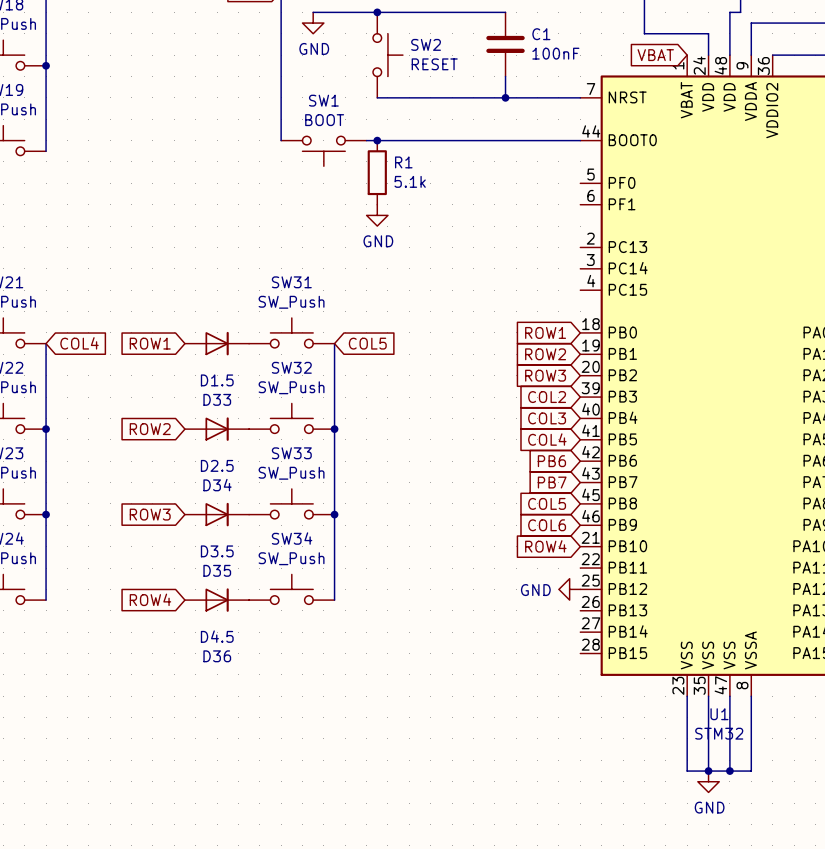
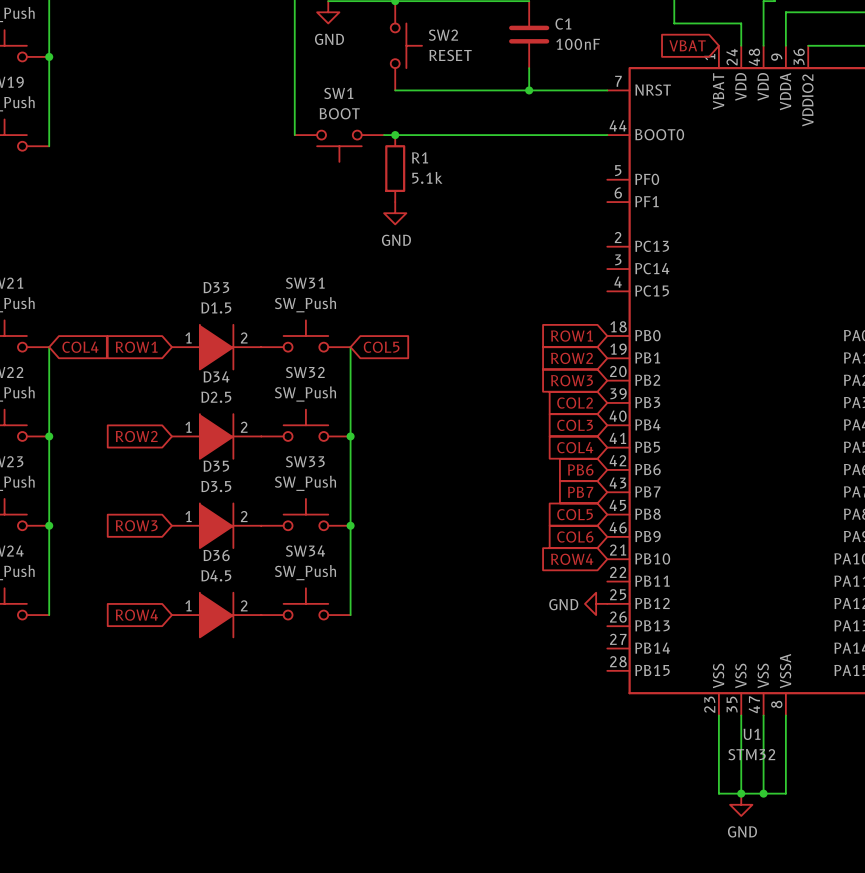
D33 symbol: [184, 331, 250, 356] -> [171, 324, 262, 370]
global label position: ROW1 (150, 343) -> ROW1 (136, 347)
D33 value position: D1.5 (217, 380) -> D1.5 (216, 307)
D33 name position: D33 (217, 399) -> D33 (216, 287)
D34 symbol: [184, 417, 250, 441] -> [171, 414, 262, 459]
global label position: ROW2 (150, 429) -> ROW2 (136, 436)
D34 value position: D2.5 (217, 465) -> D2.5 (216, 397)
D34 name position: D34 (217, 485) -> D34 (216, 376)
D35 symbol: [184, 502, 250, 527] -> [171, 503, 262, 549]
global label position: ROW3 (150, 514) -> ROW3 (136, 525)
D35 value position: D3.5 (217, 551) -> D3.5 (216, 486)
D35 name position: D35 (217, 570) -> D35 (216, 466)
D36 symbol: [184, 588, 250, 612] -> [171, 592, 262, 638]
global label position: ROW4 (150, 599) -> ROW4 (136, 615)
D36 value position: D4.5 (217, 636) -> D4.5 (216, 575)
D36 name position: D36 (217, 656) -> D36 (216, 555)

